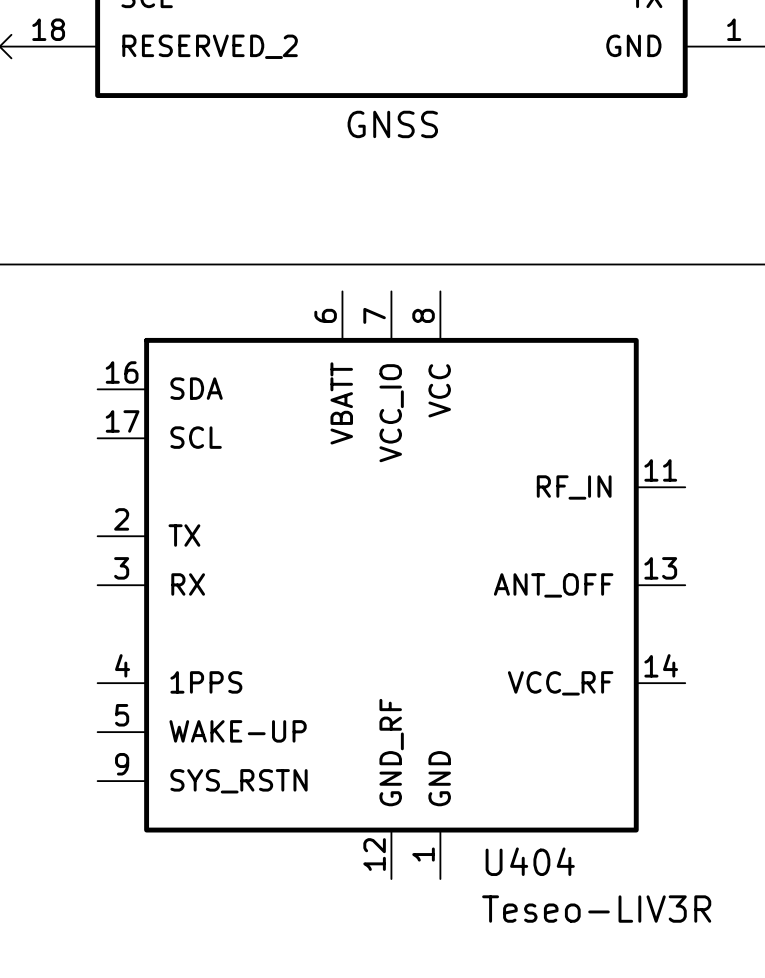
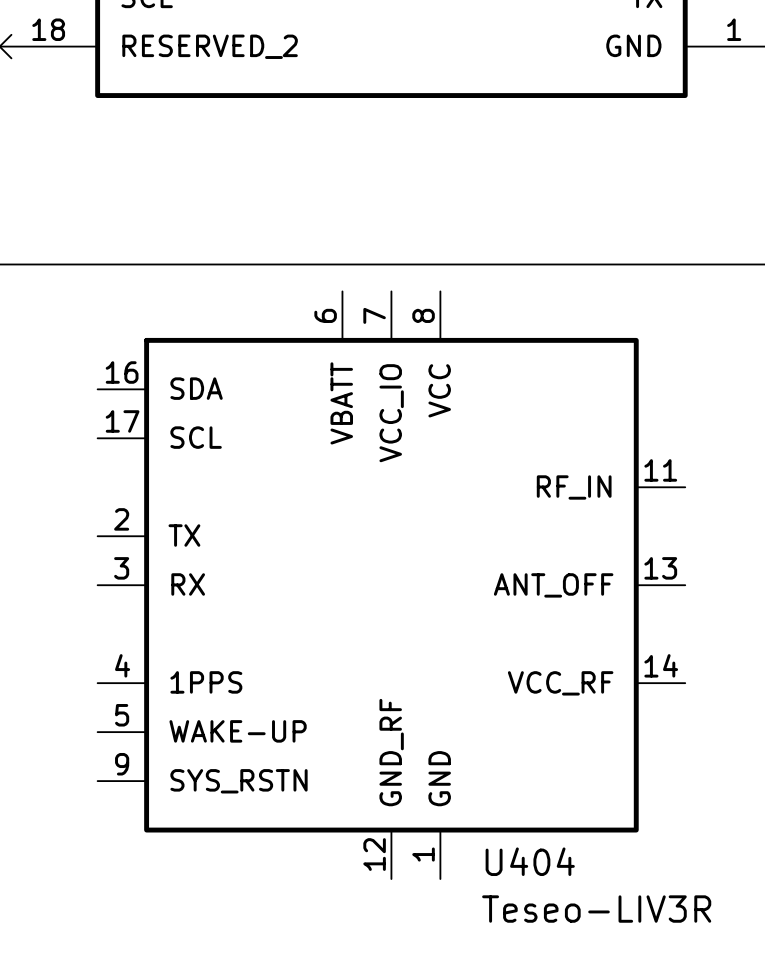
text: GNSS (392, 124) -> none

